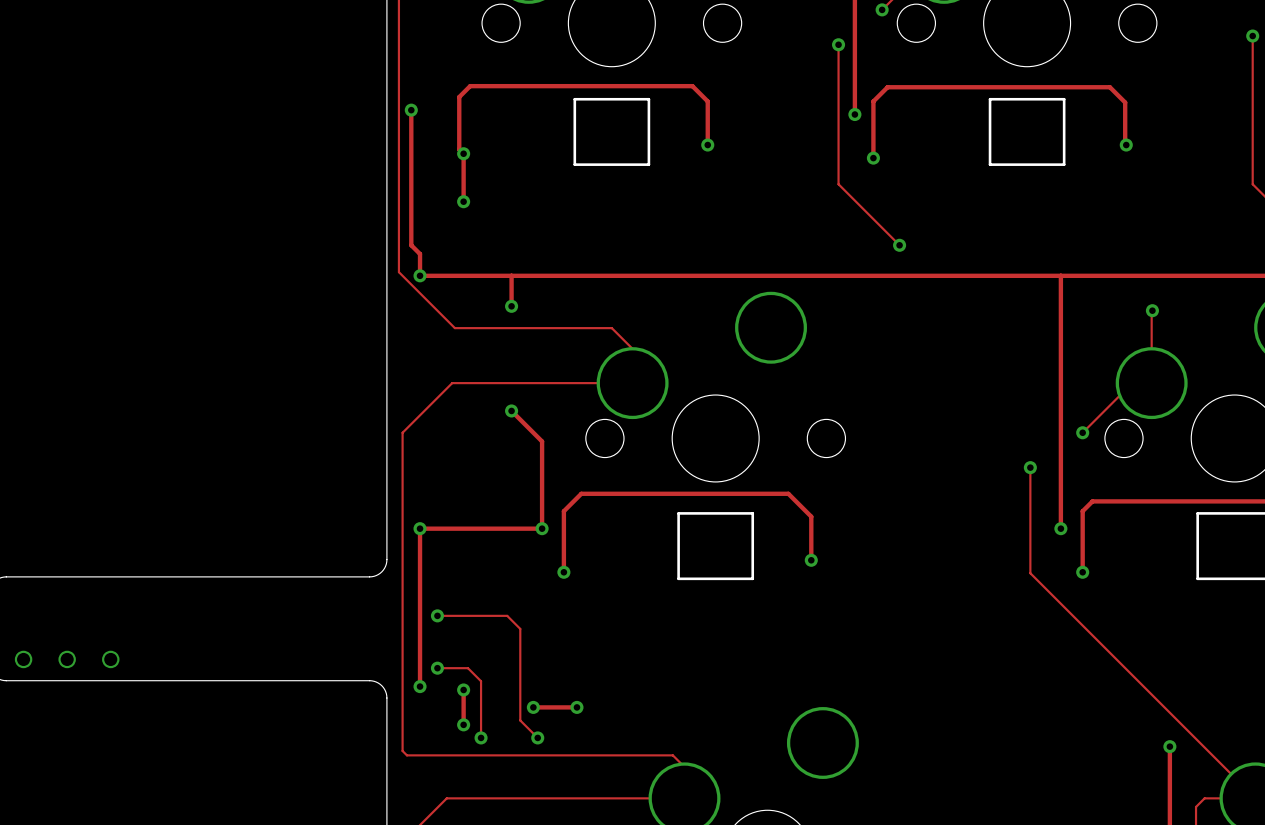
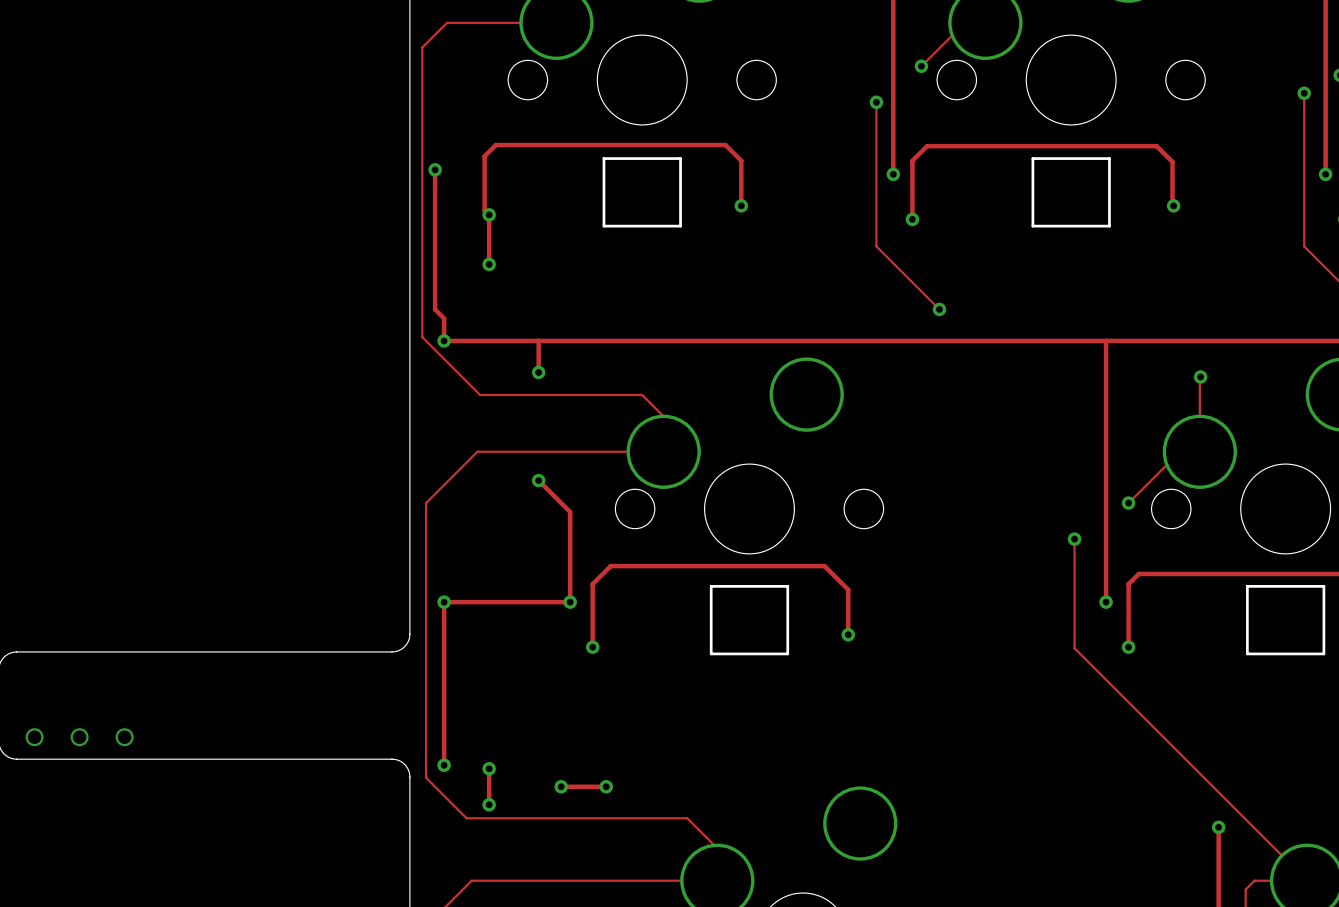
track: (437, 615) (507, 615) (520, 628) (520, 720) (537, 737) -> none
via: (437, 615) -> none
track: (437, 668) (467, 668) (481, 681) (481, 737) -> none
via: (437, 668) -> none
track: (402, 698) (402, 751) (406, 755) (672, 755) -> (426, 777) (466, 818) (687, 818) (705, 836)
via: (481, 737) -> none
via: (537, 737) -> none

